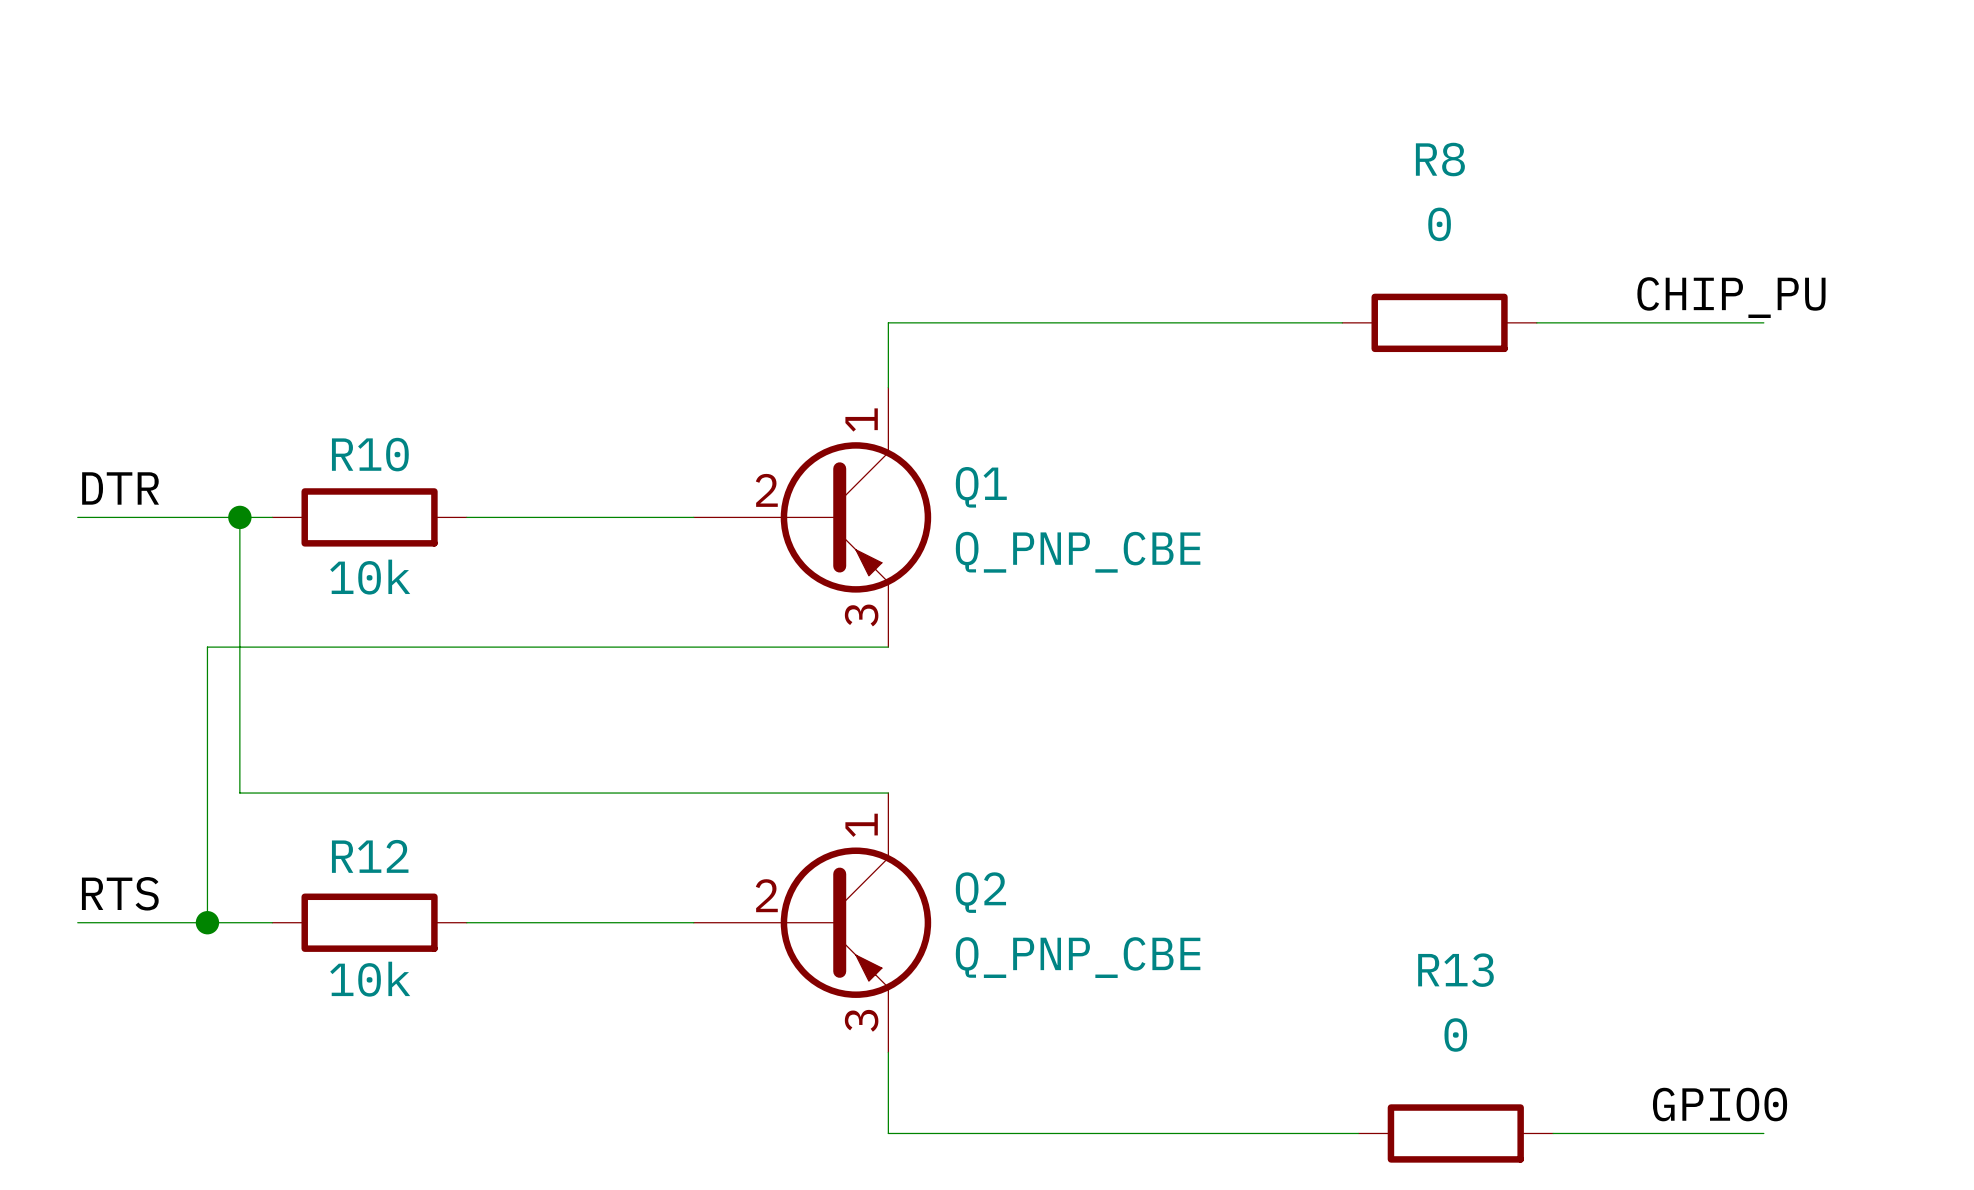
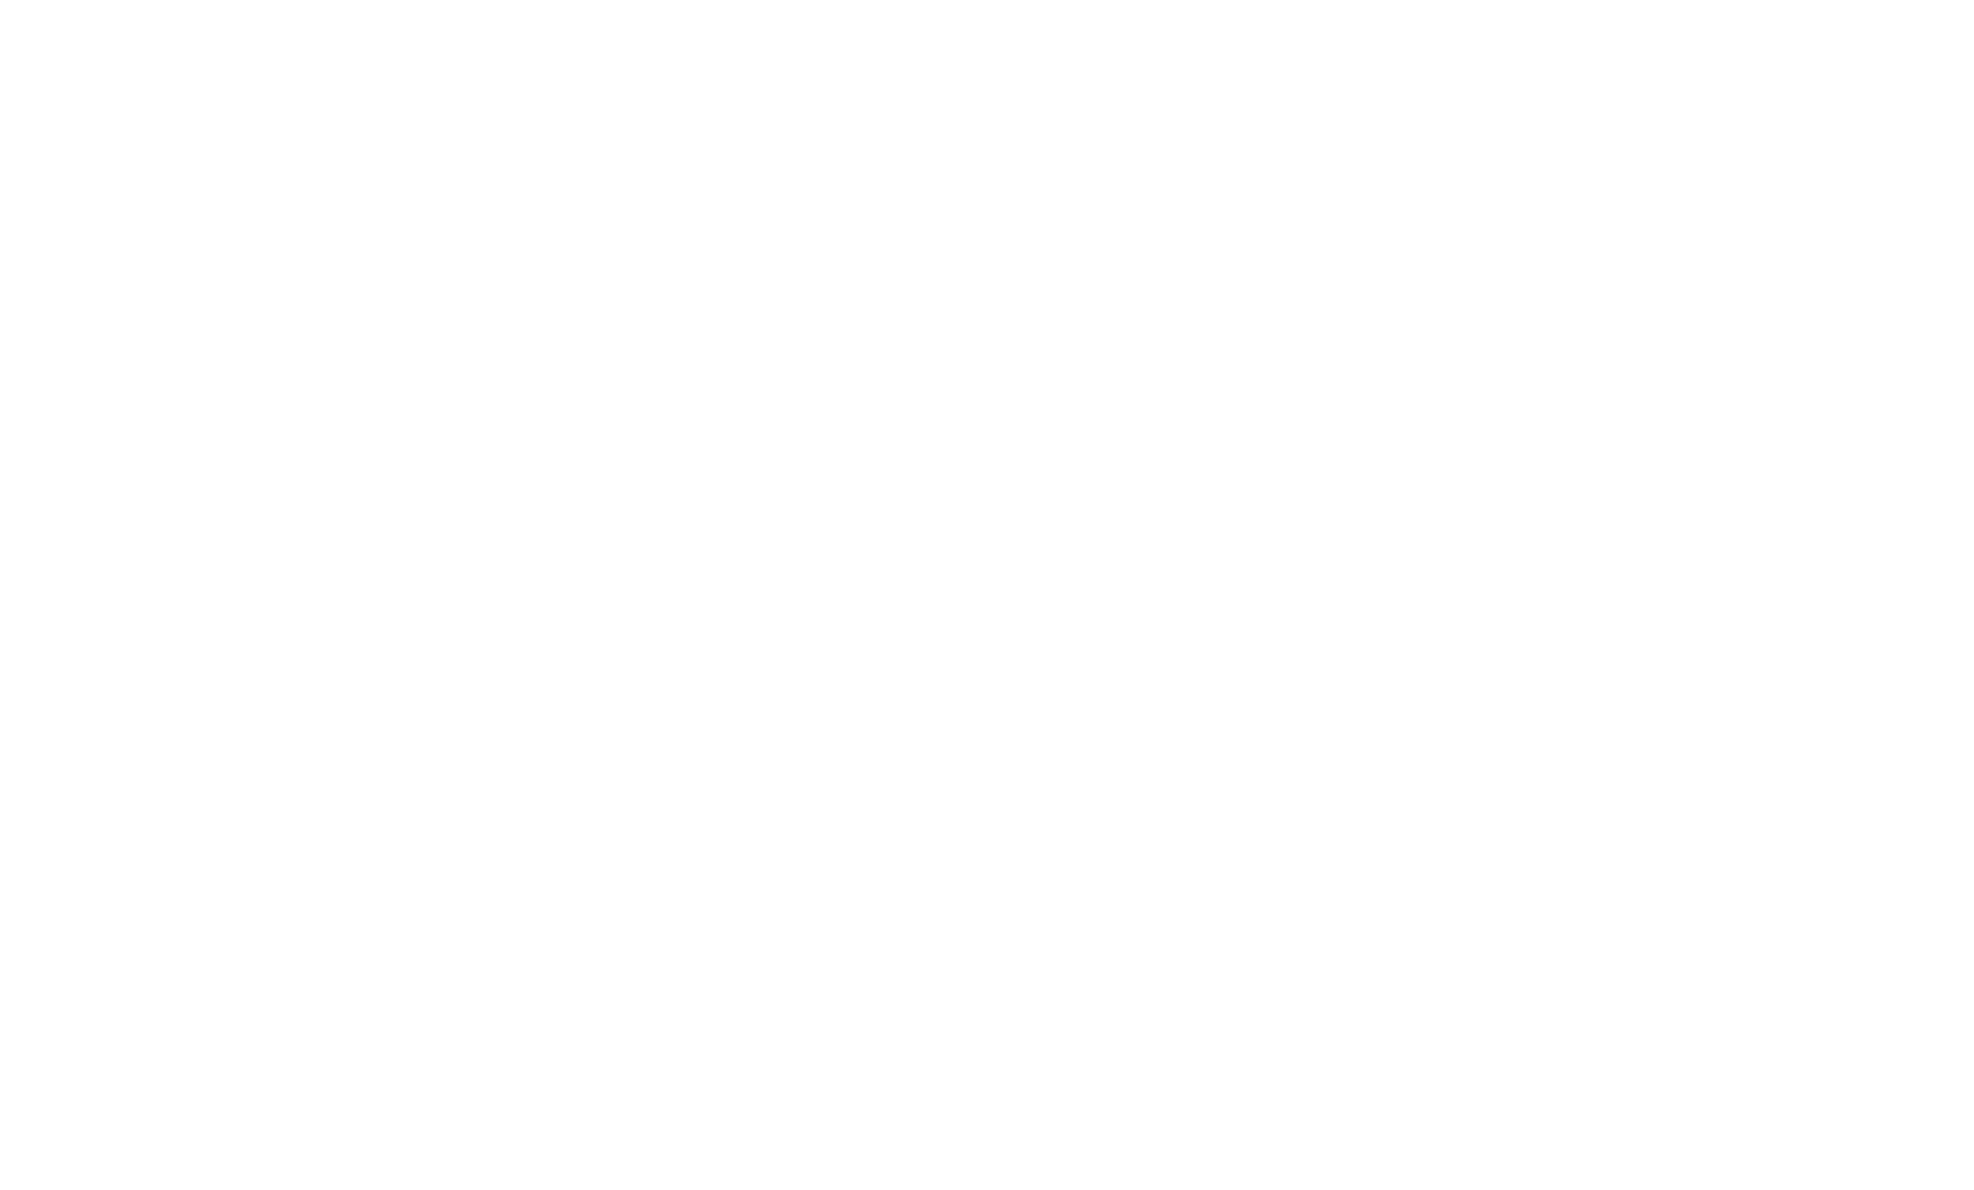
label: CHIP_PU (1731, 297) -> none
wire: (1342, 322) (888, 322) (888, 387) -> none
R8: 0 (1439, 322) -> none
wire: (1536, 322) (1763, 322) -> none
label: DTR (120, 488) -> none
wire: (77, 517) (272, 517) -> none
wire: (239, 517) (239, 793) (888, 793) -> none
junction: (239, 517) -> none
R10: 10k (369, 517) -> none
wire: (466, 517) (693, 517) -> none
Q1: Q_PNP_CBE (812, 517) -> none
wire: (888, 647) (207, 647) (207, 922) -> none
label: RTS (120, 893) -> none
wire: (77, 922) (272, 922) -> none
junction: (207, 922) -> none
R12: 10k (369, 922) -> none
wire: (466, 922) (693, 922) -> none
Q2: Q_PNP_CBE (812, 922) -> none
wire: (888, 1052) (888, 1133) (1358, 1133) -> none
label: GPIO0 (1720, 1104) -> none
R13: 0 (1455, 1133) -> none
wire: (1553, 1133) (1763, 1133) -> none

